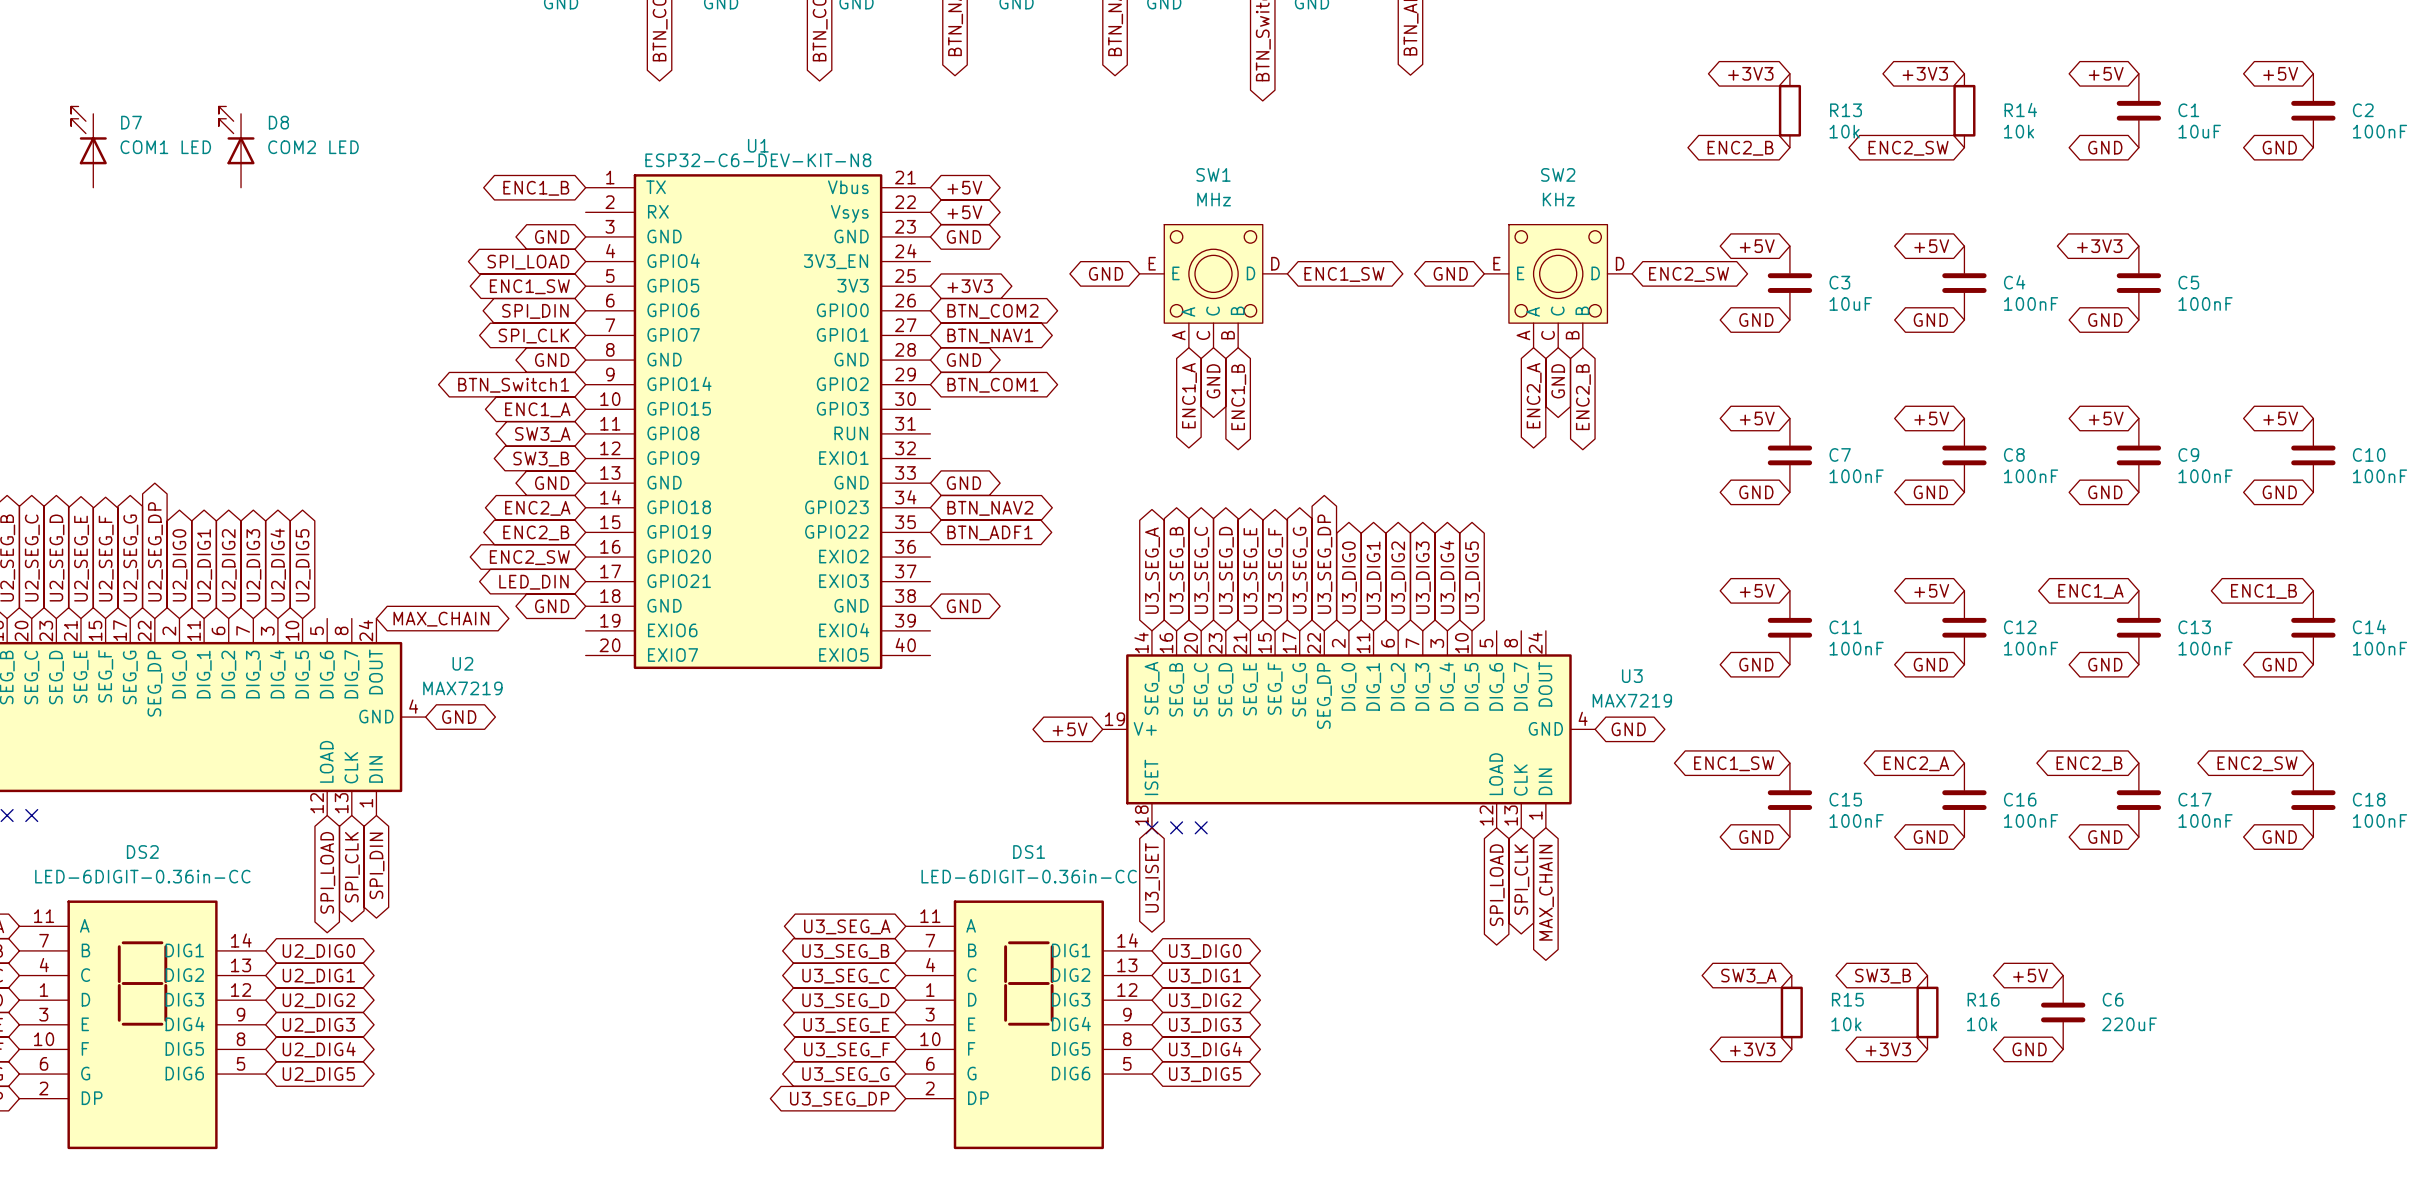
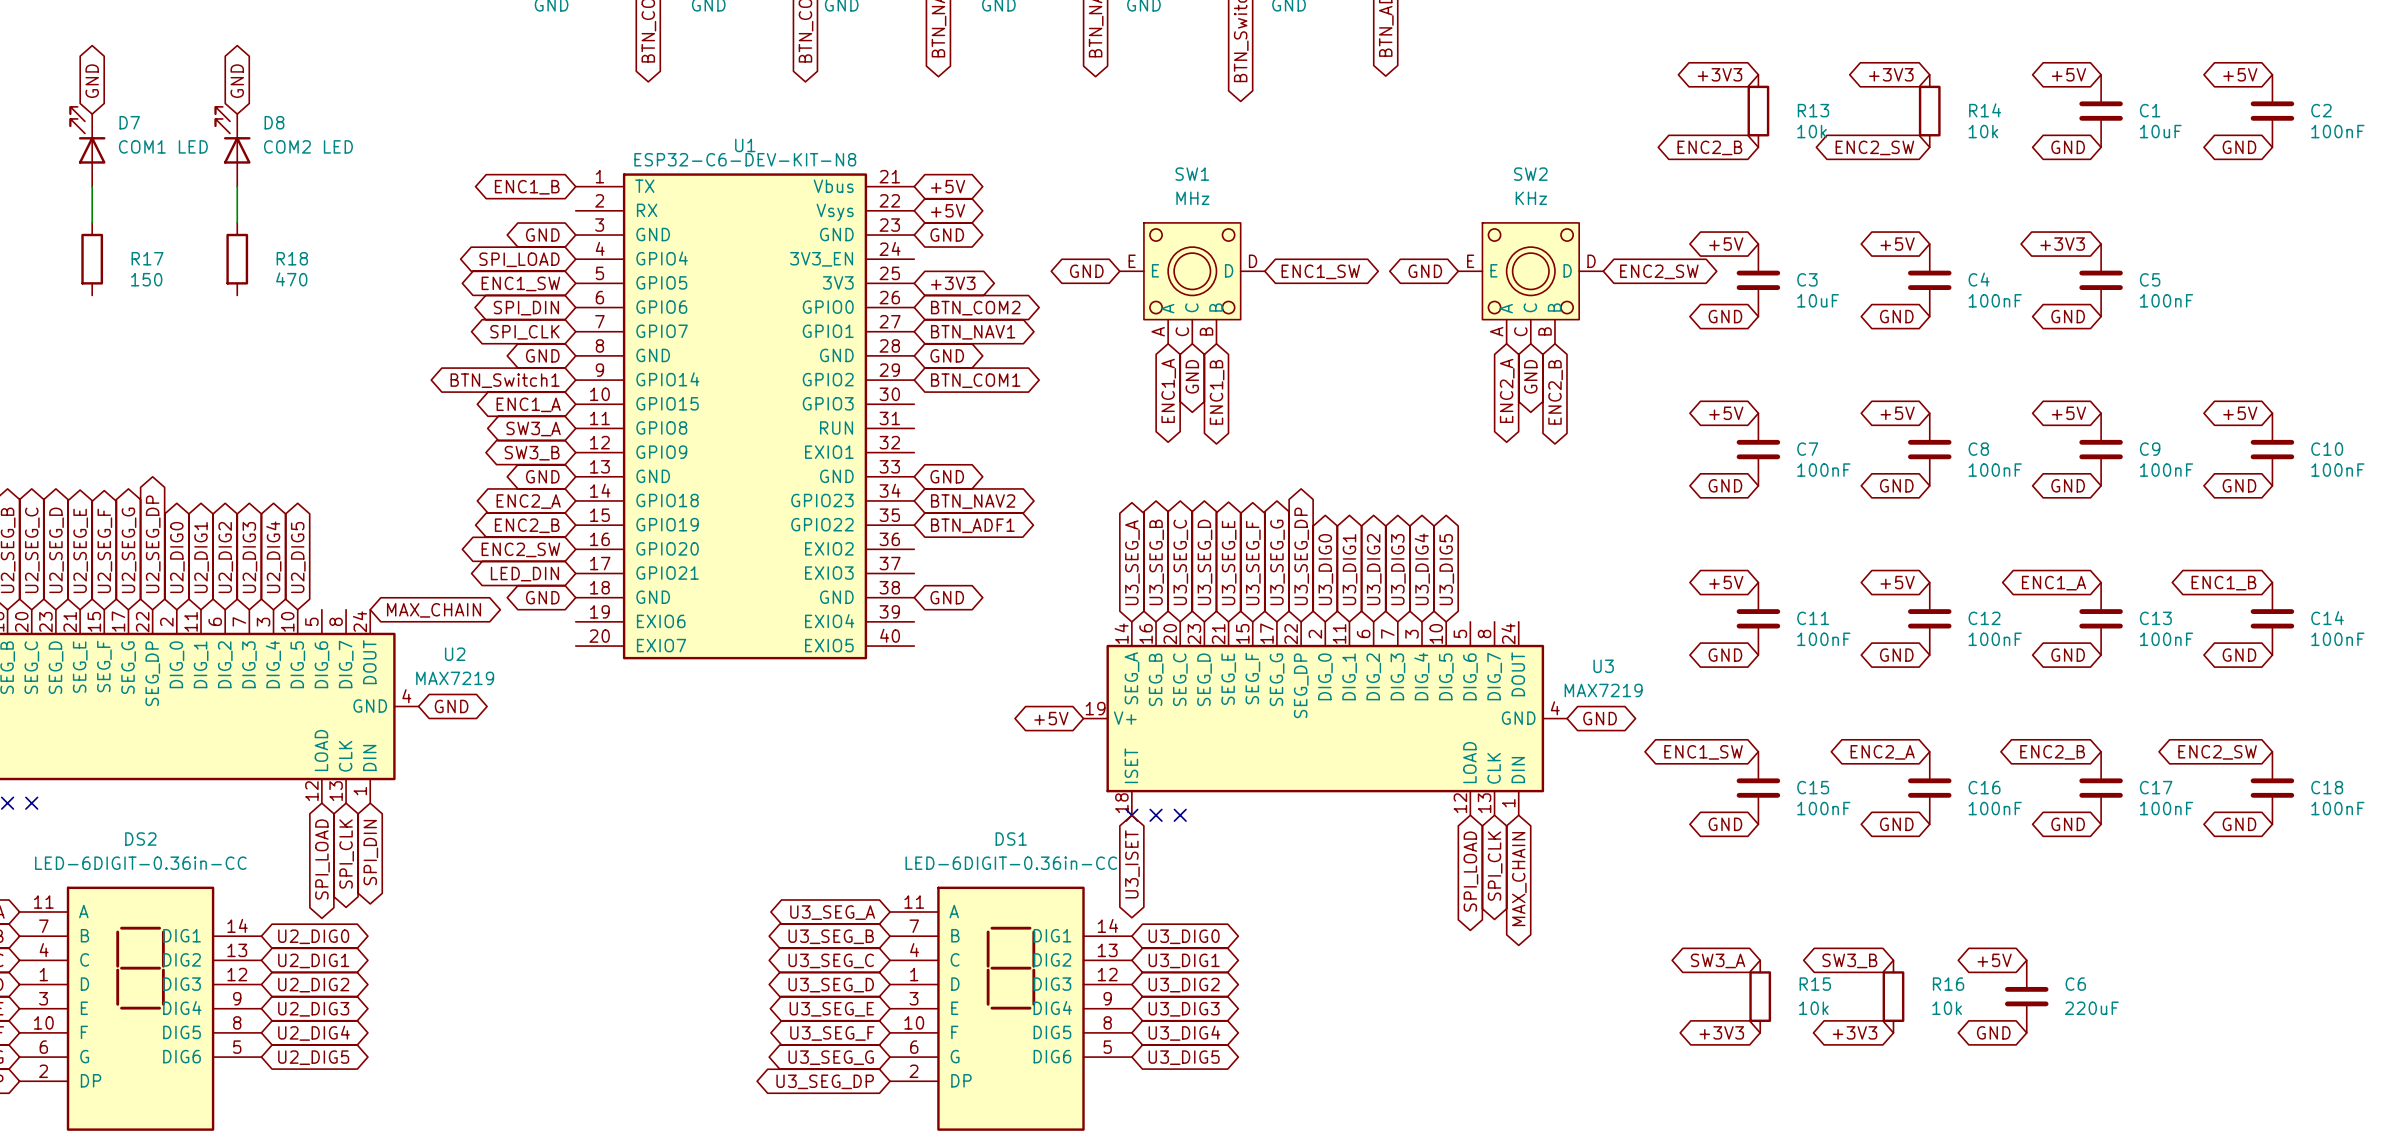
global label: none -> GND (92, 81)
global label: none -> GND (237, 81)
wire: none -> (92, 186) (92, 222)
wire: none -> (237, 186) (237, 222)
R17: none -> 150 (92, 259)
R18: none -> 470 (237, 259)

